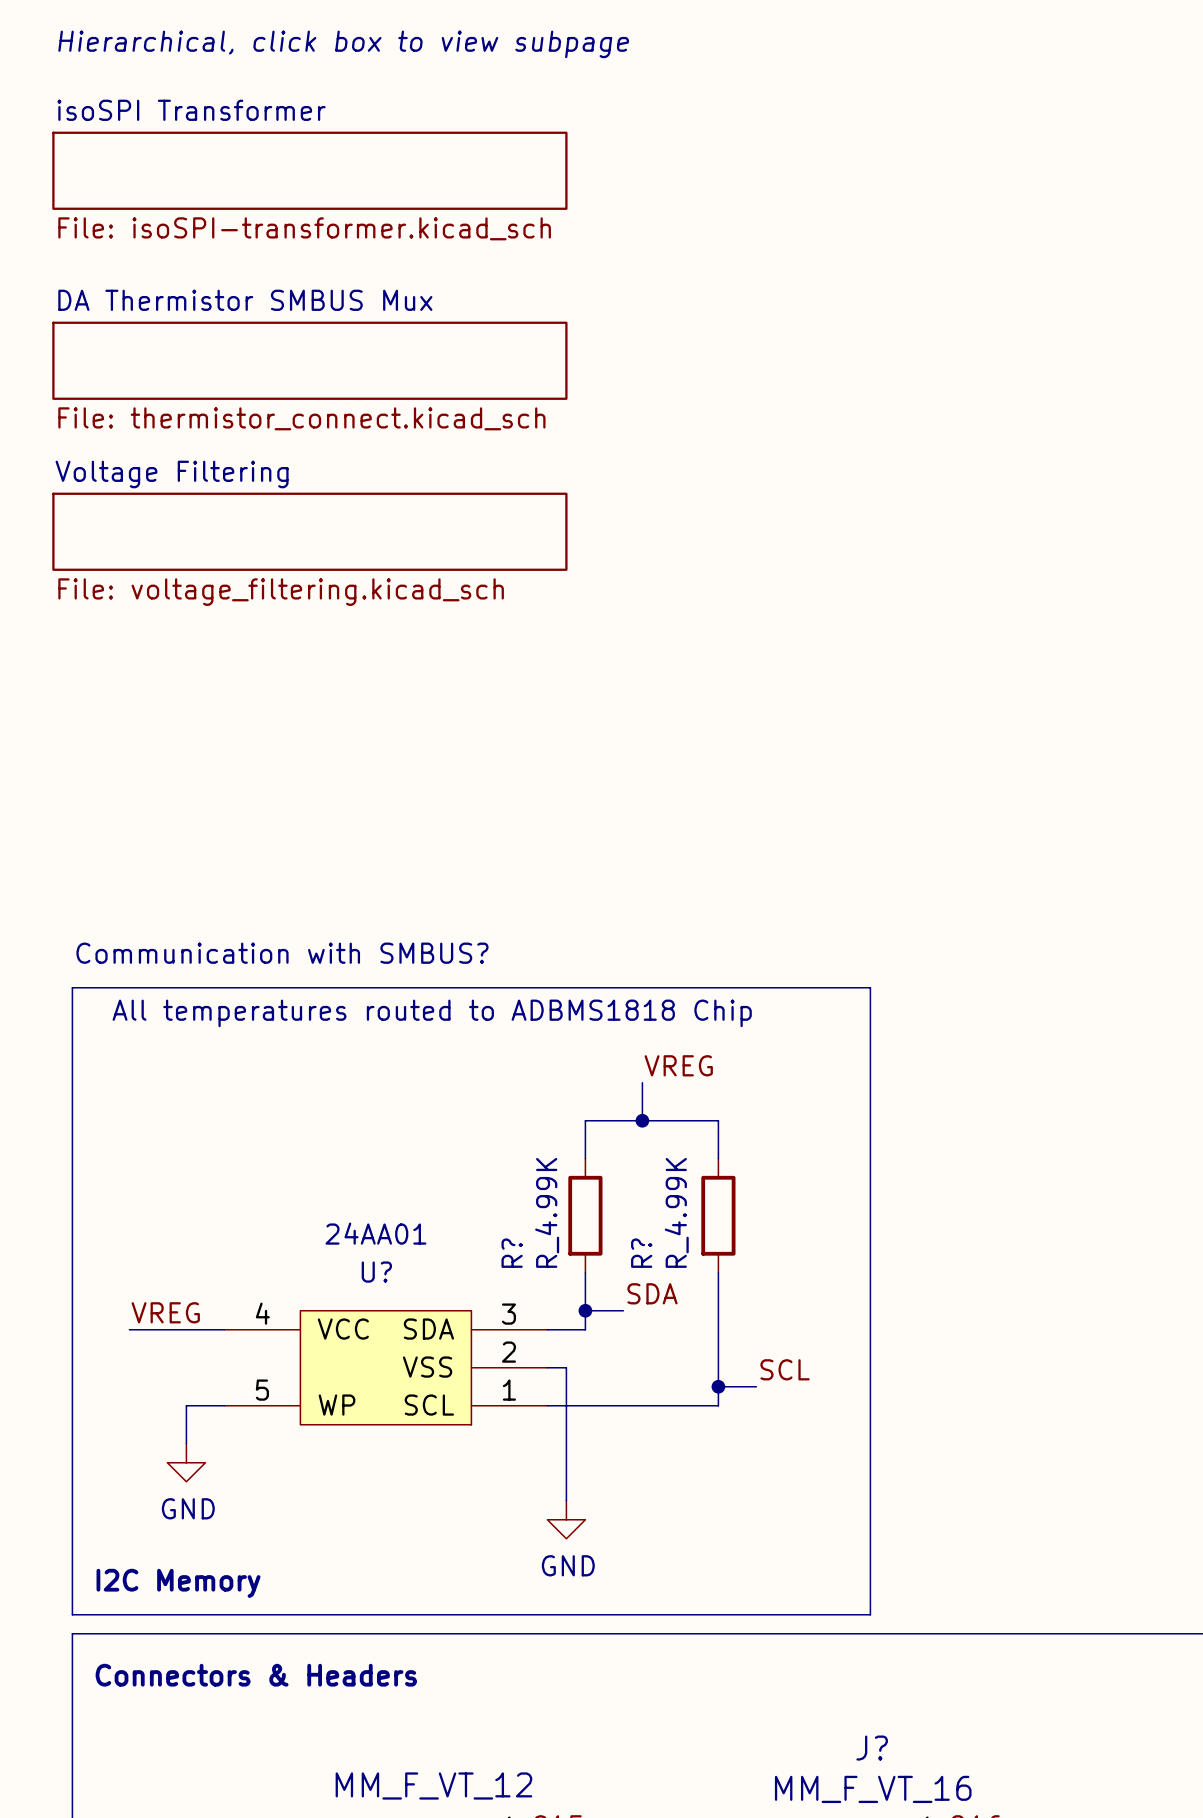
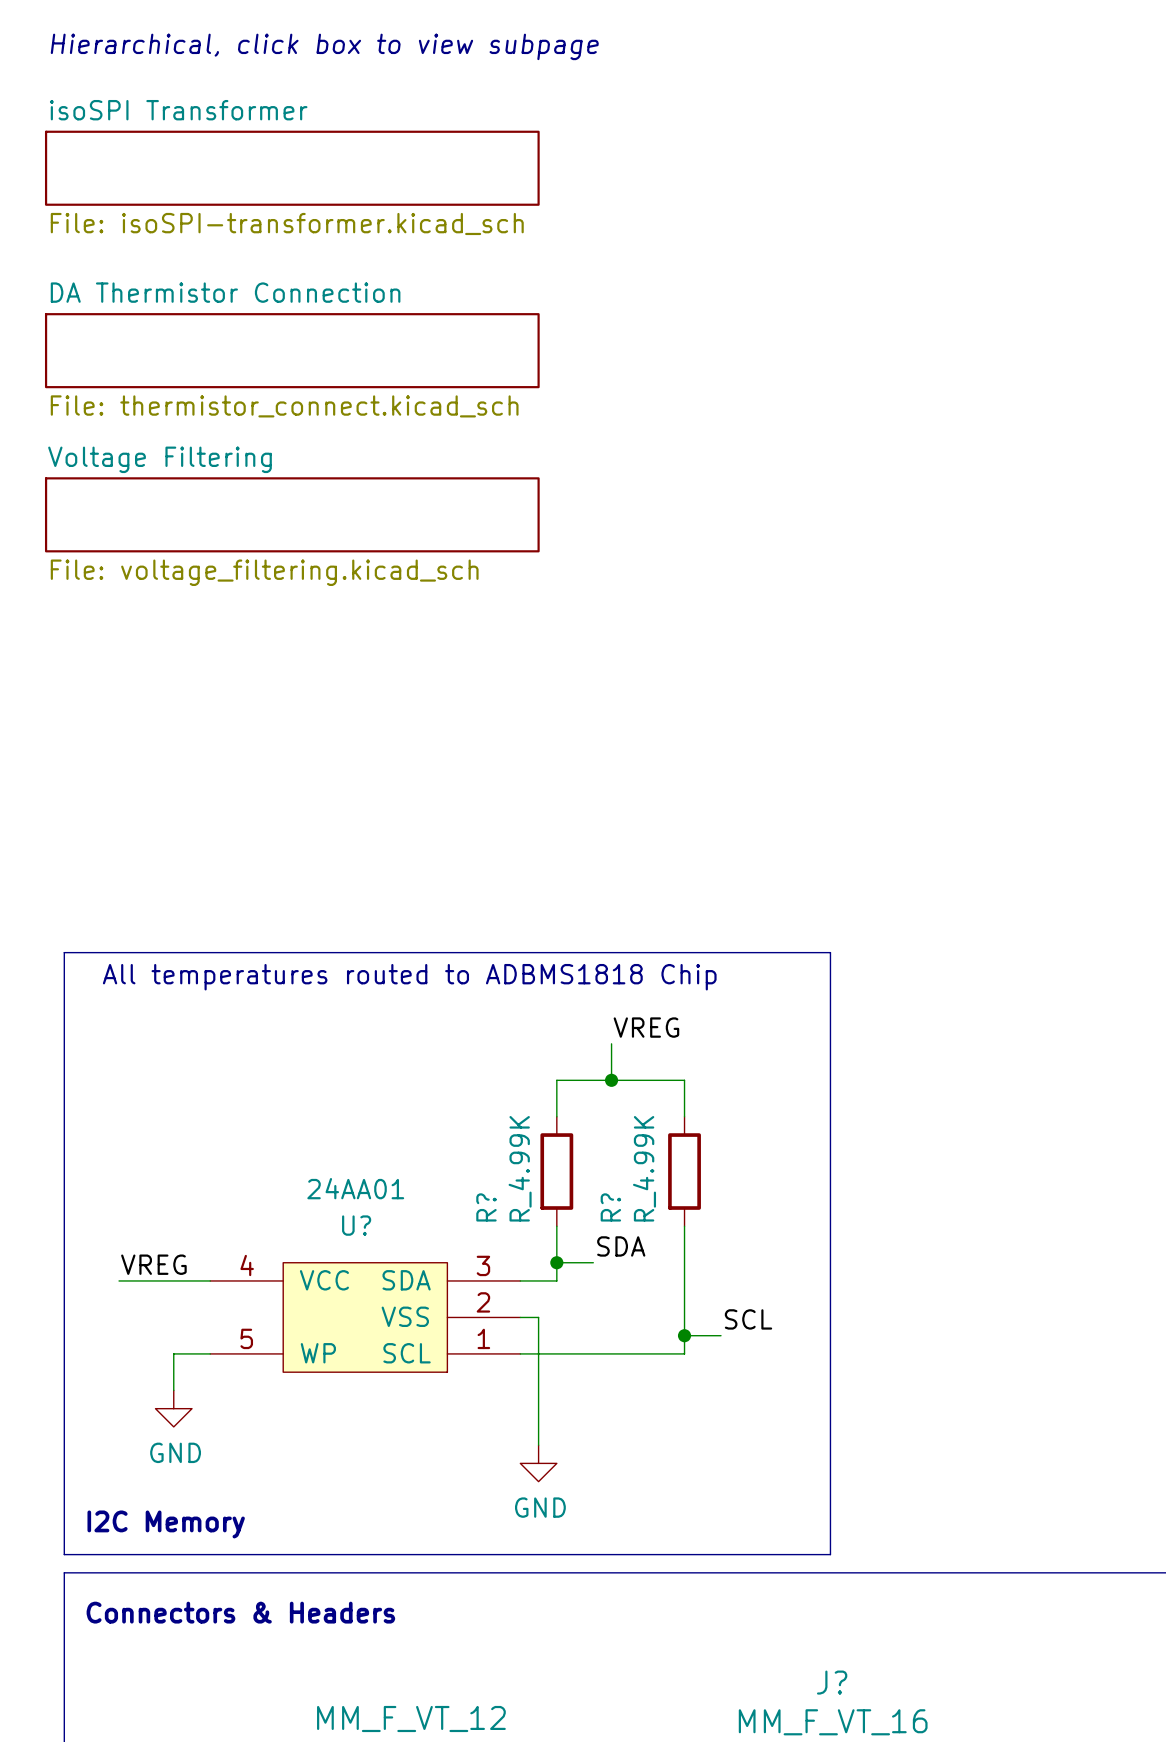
sheet DA Thermistor SMBUS Mux name: DA Thermistor SMBUS Mux (245, 300) -> DA Thermistor Connection (225, 292)
text: Communication with SMBUS? (282, 953) -> none

